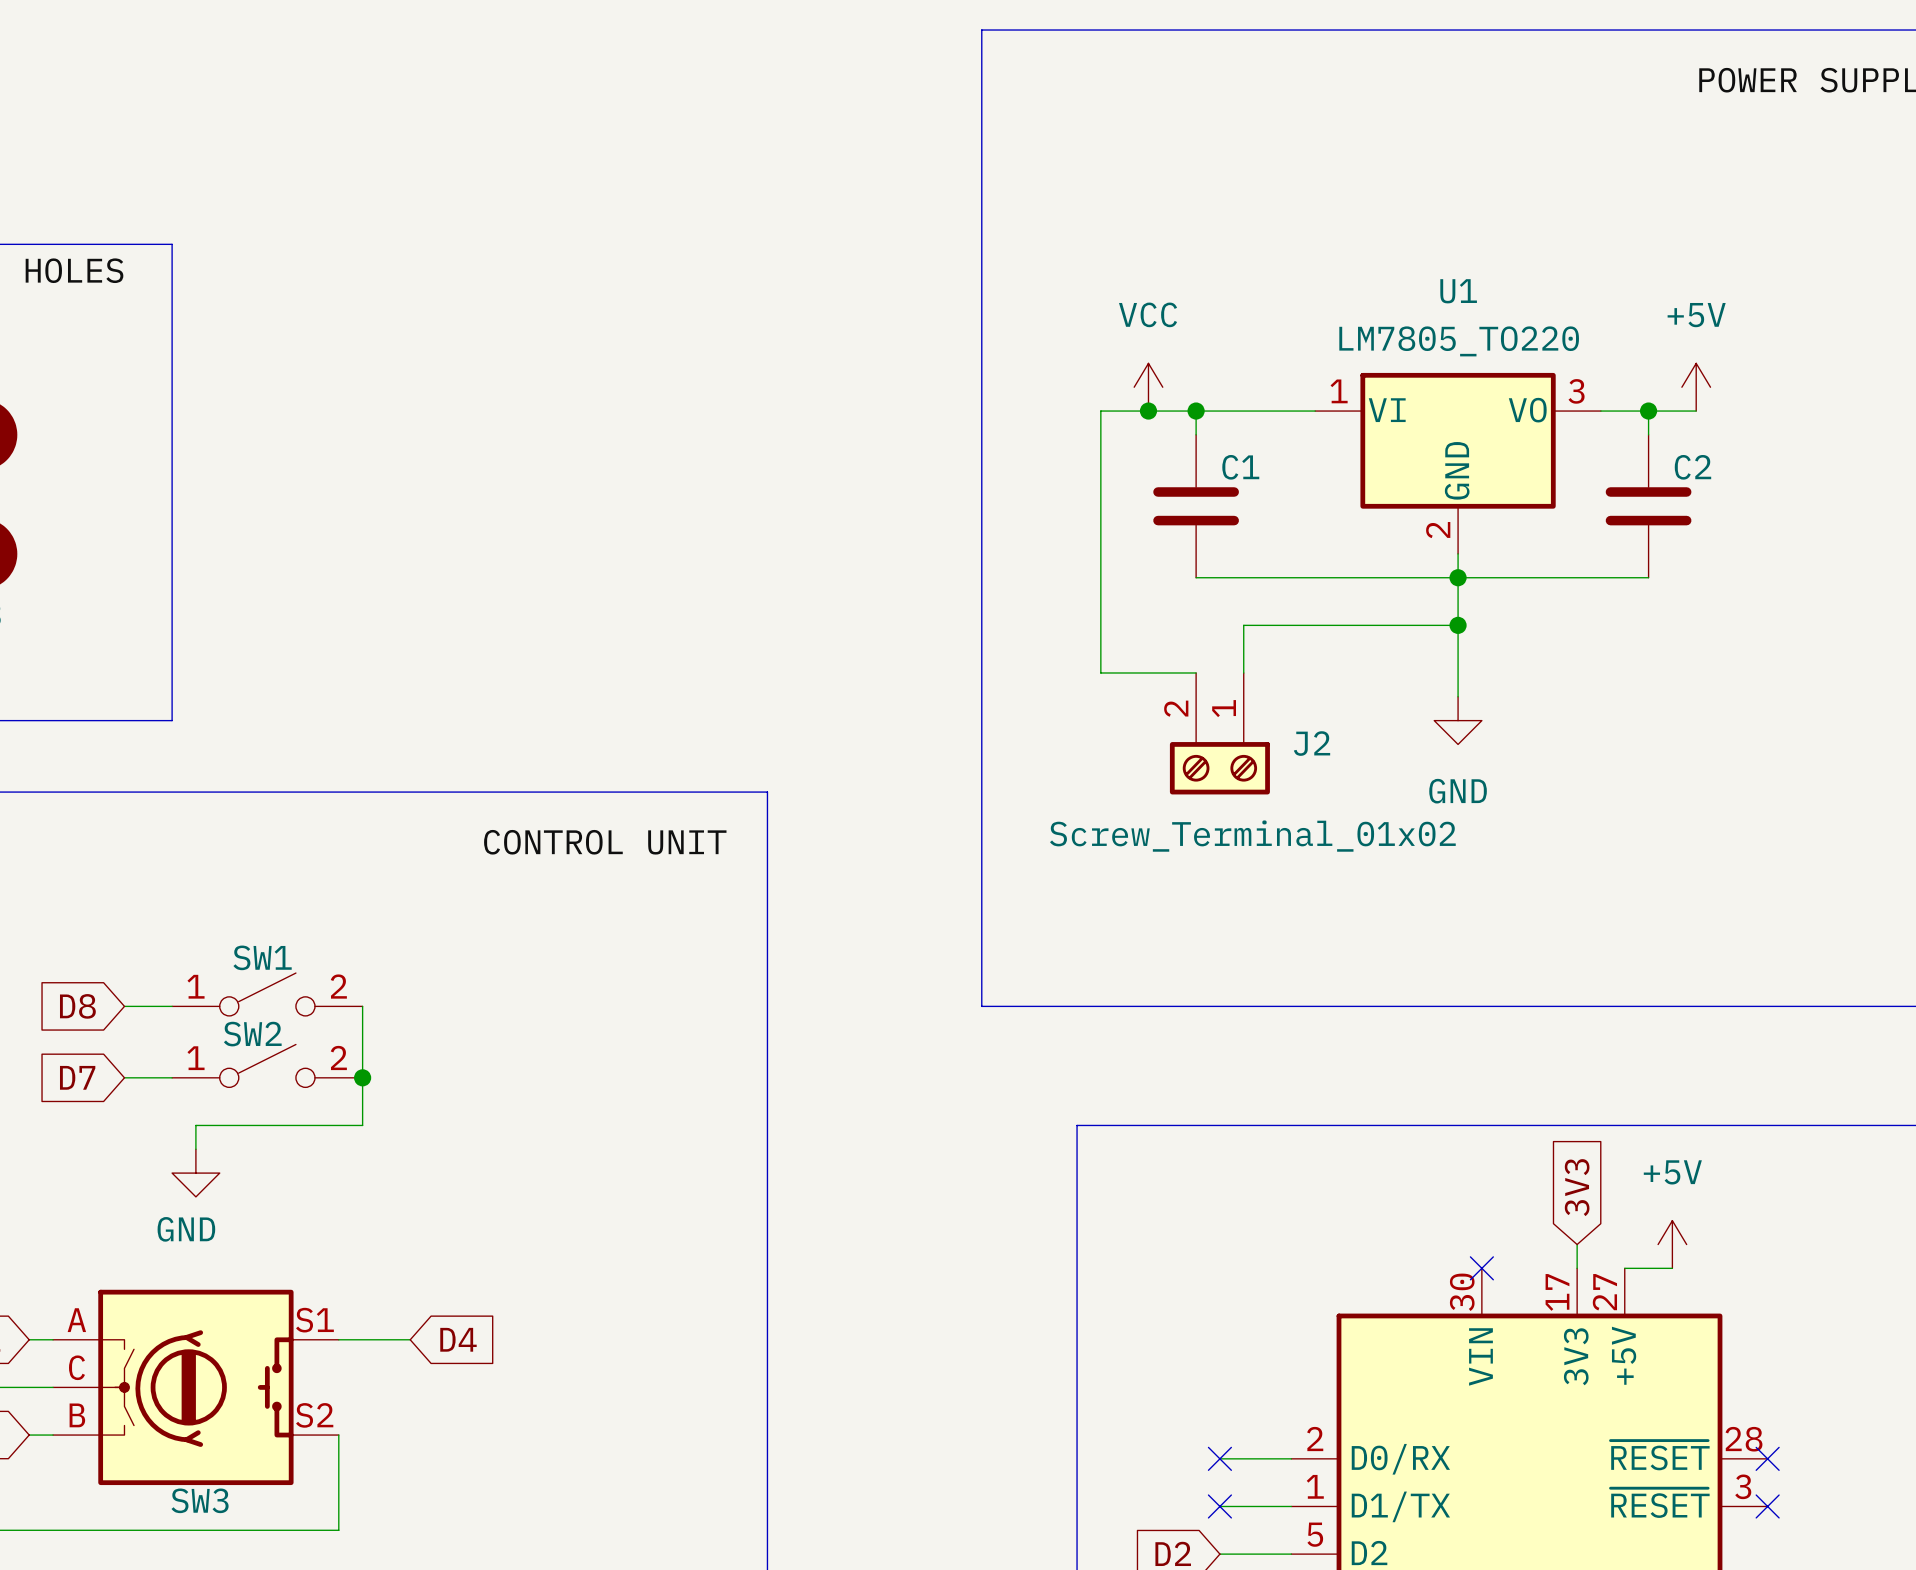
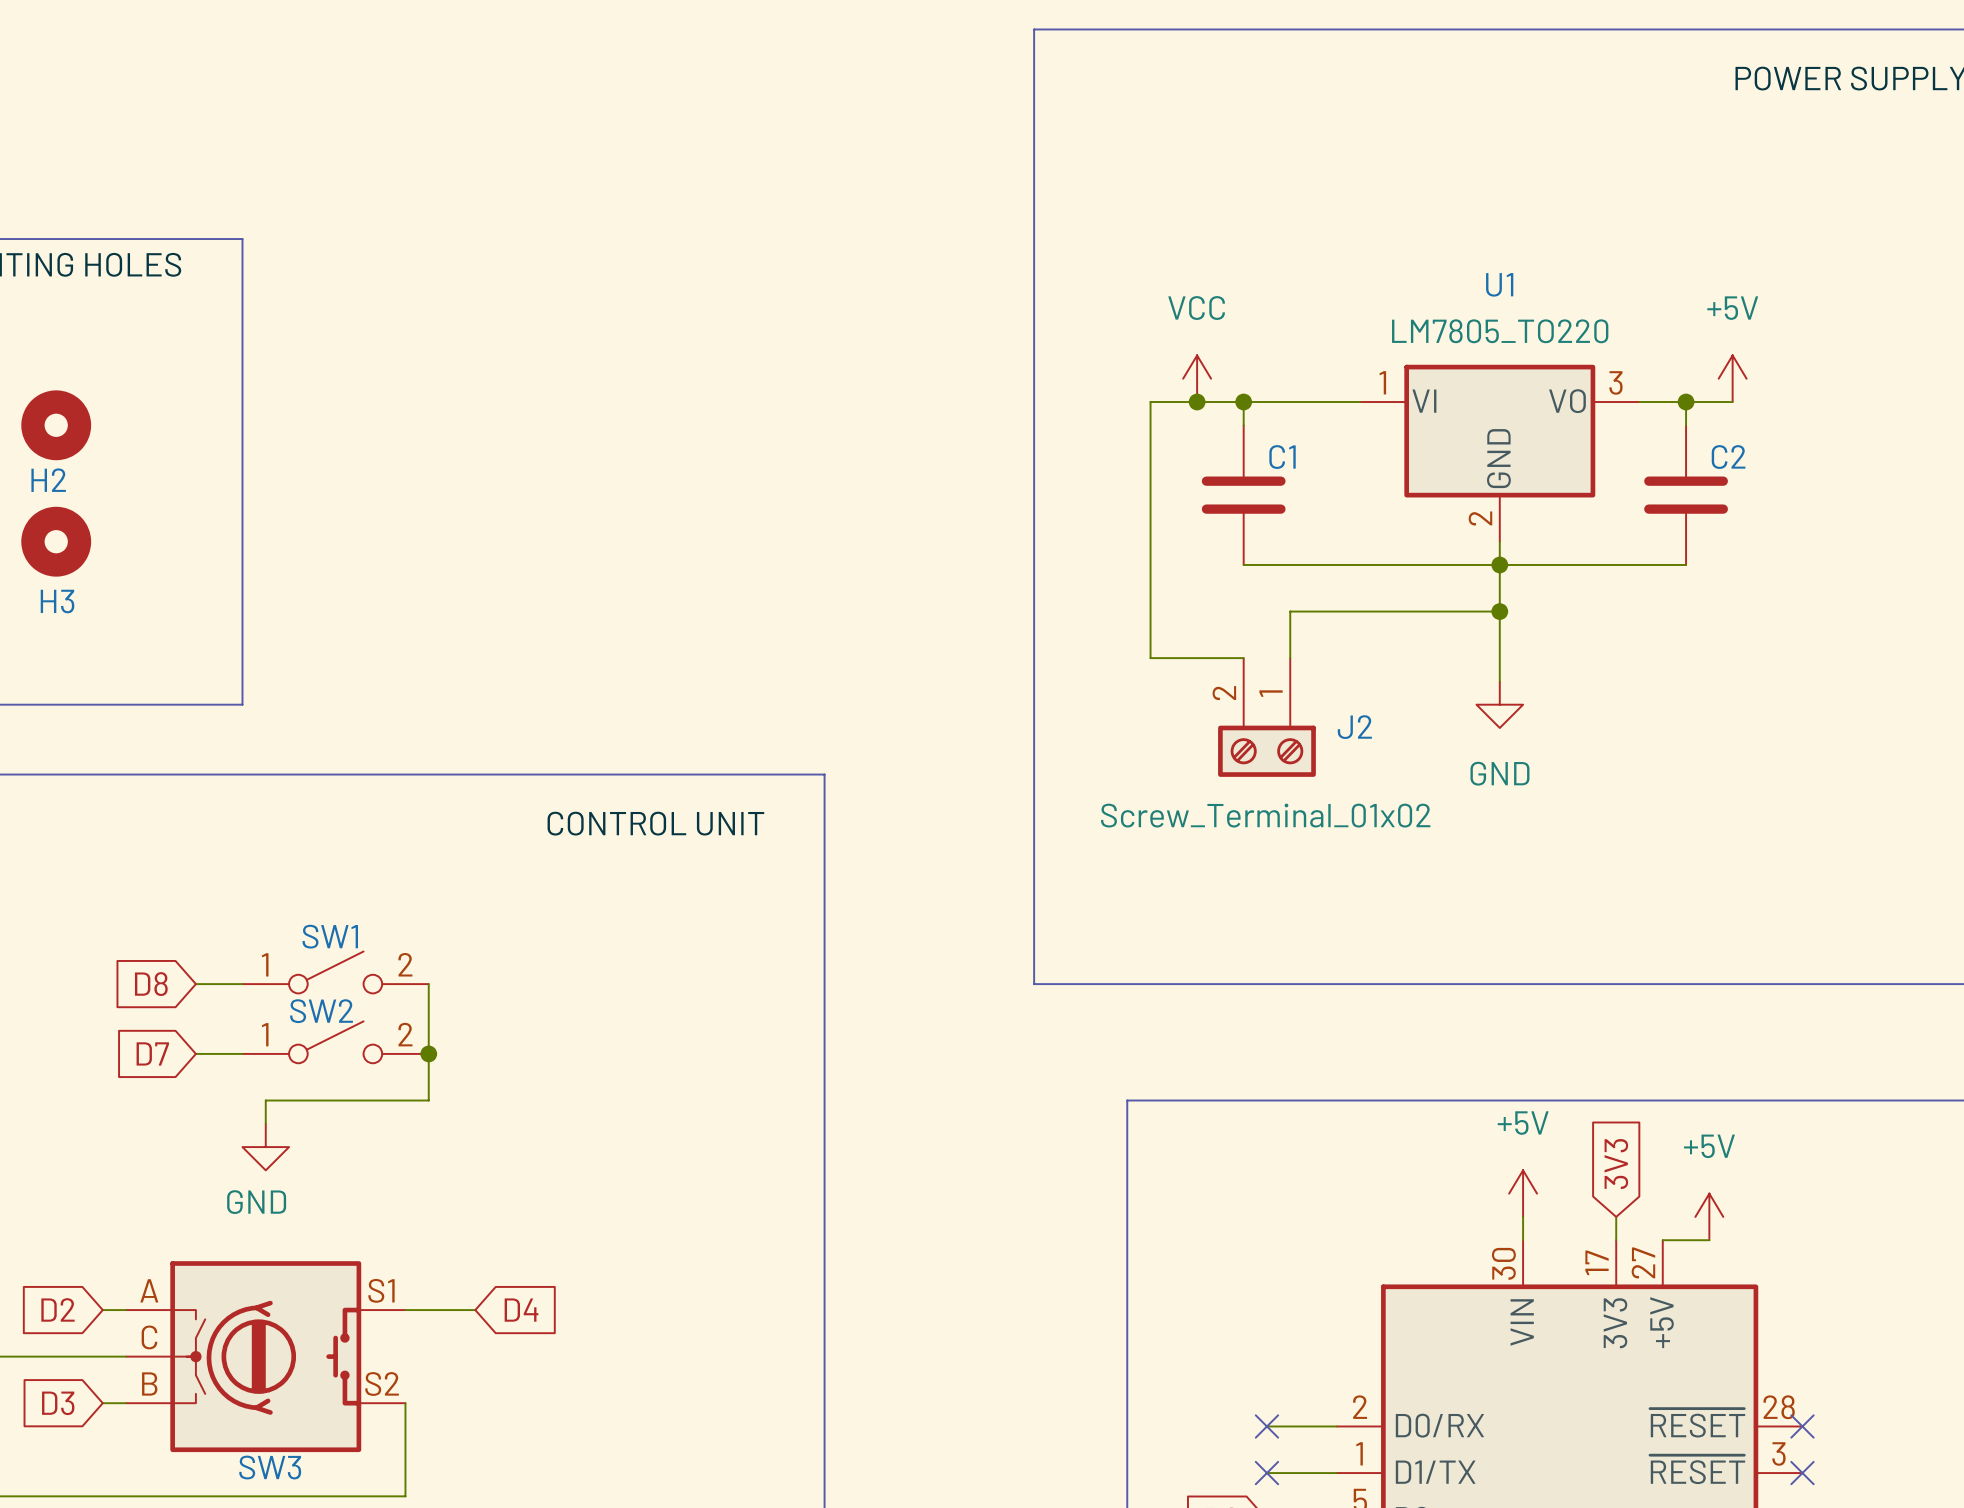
power symbol: none -> +5V (1523, 1193)
wire: none -> (1523, 1216) (1523, 1240)
no-connect mark: (1481, 1268) -> none

